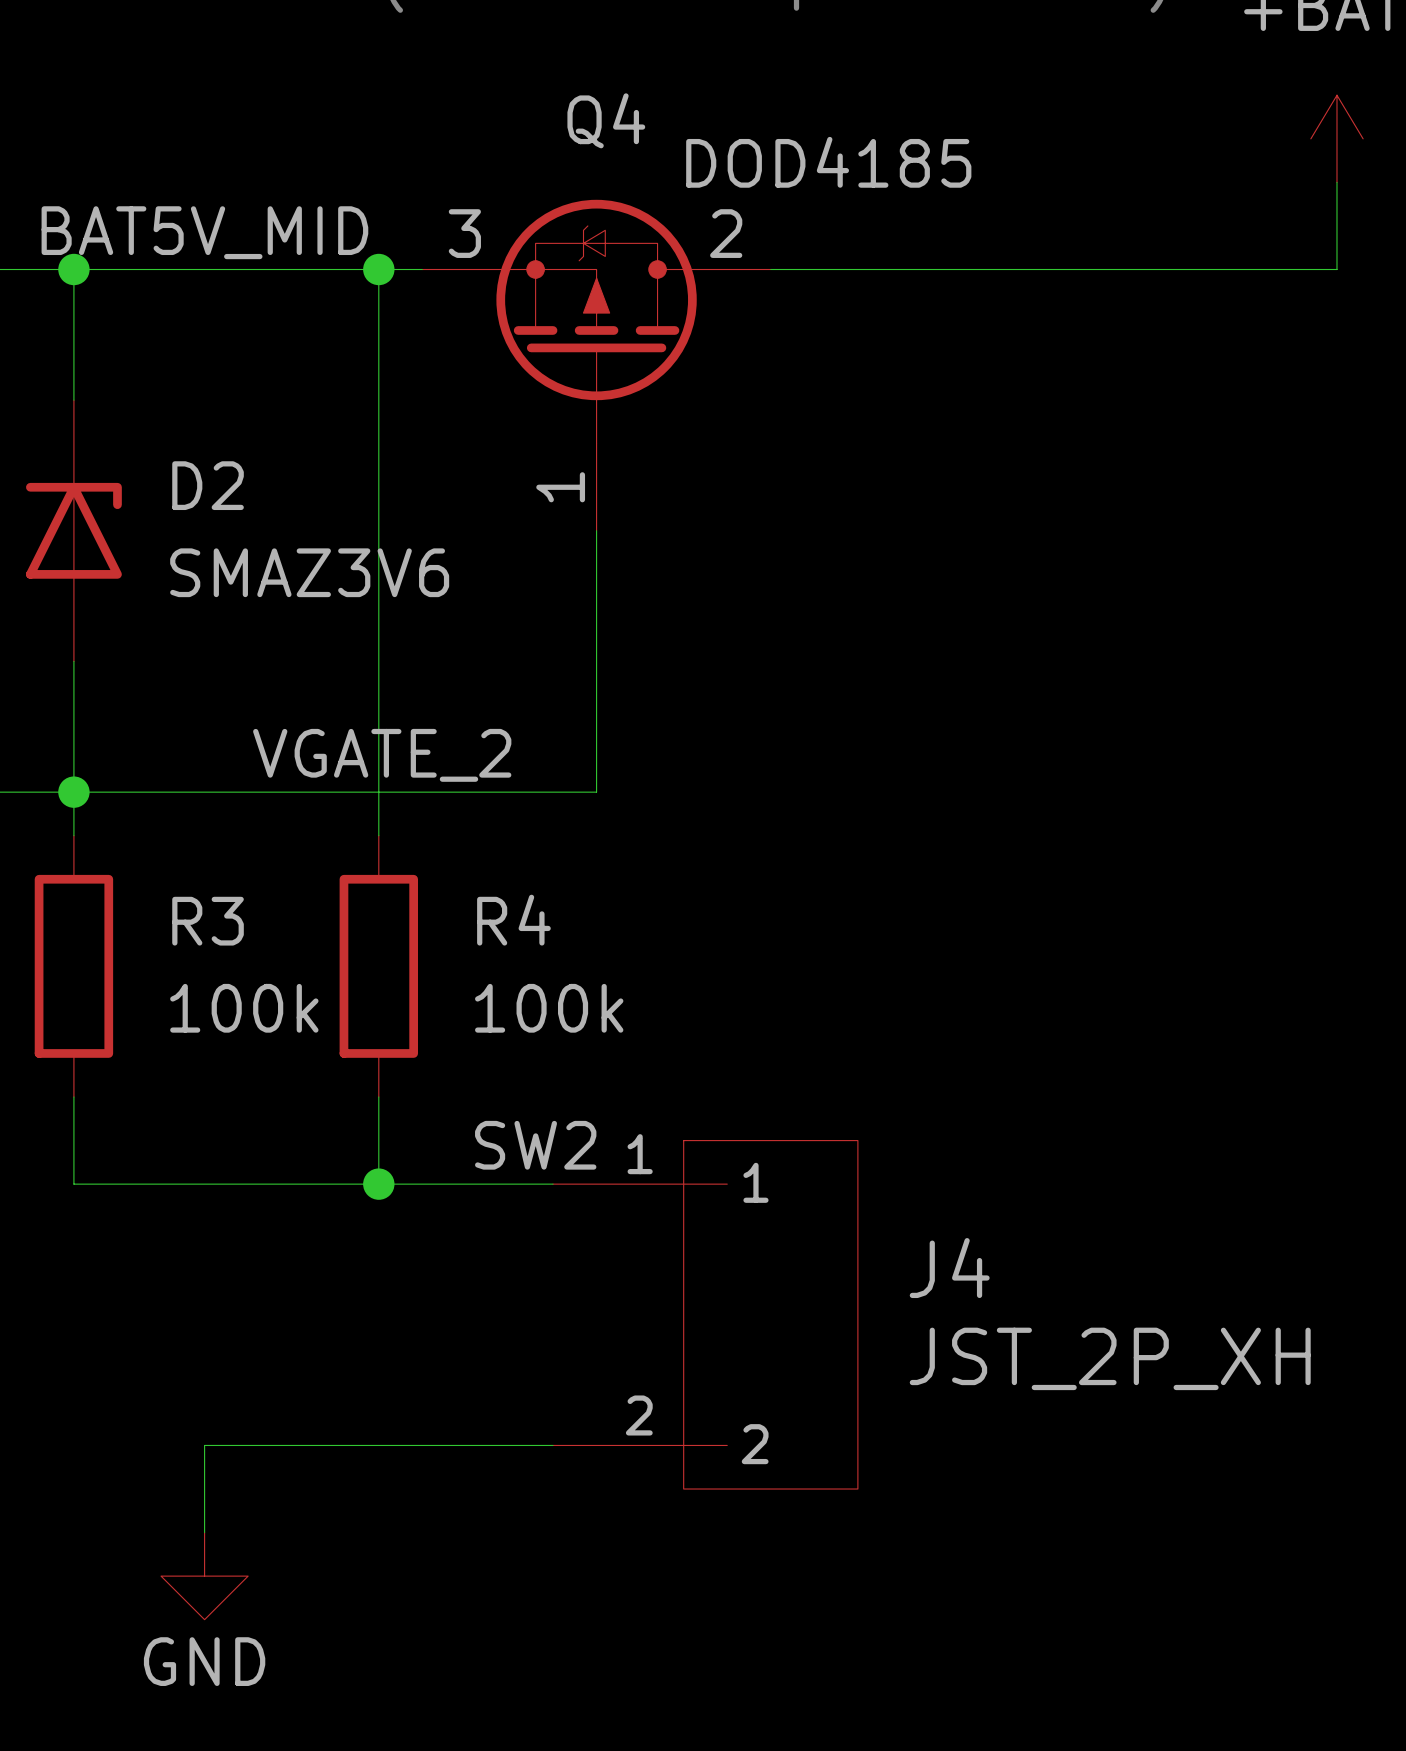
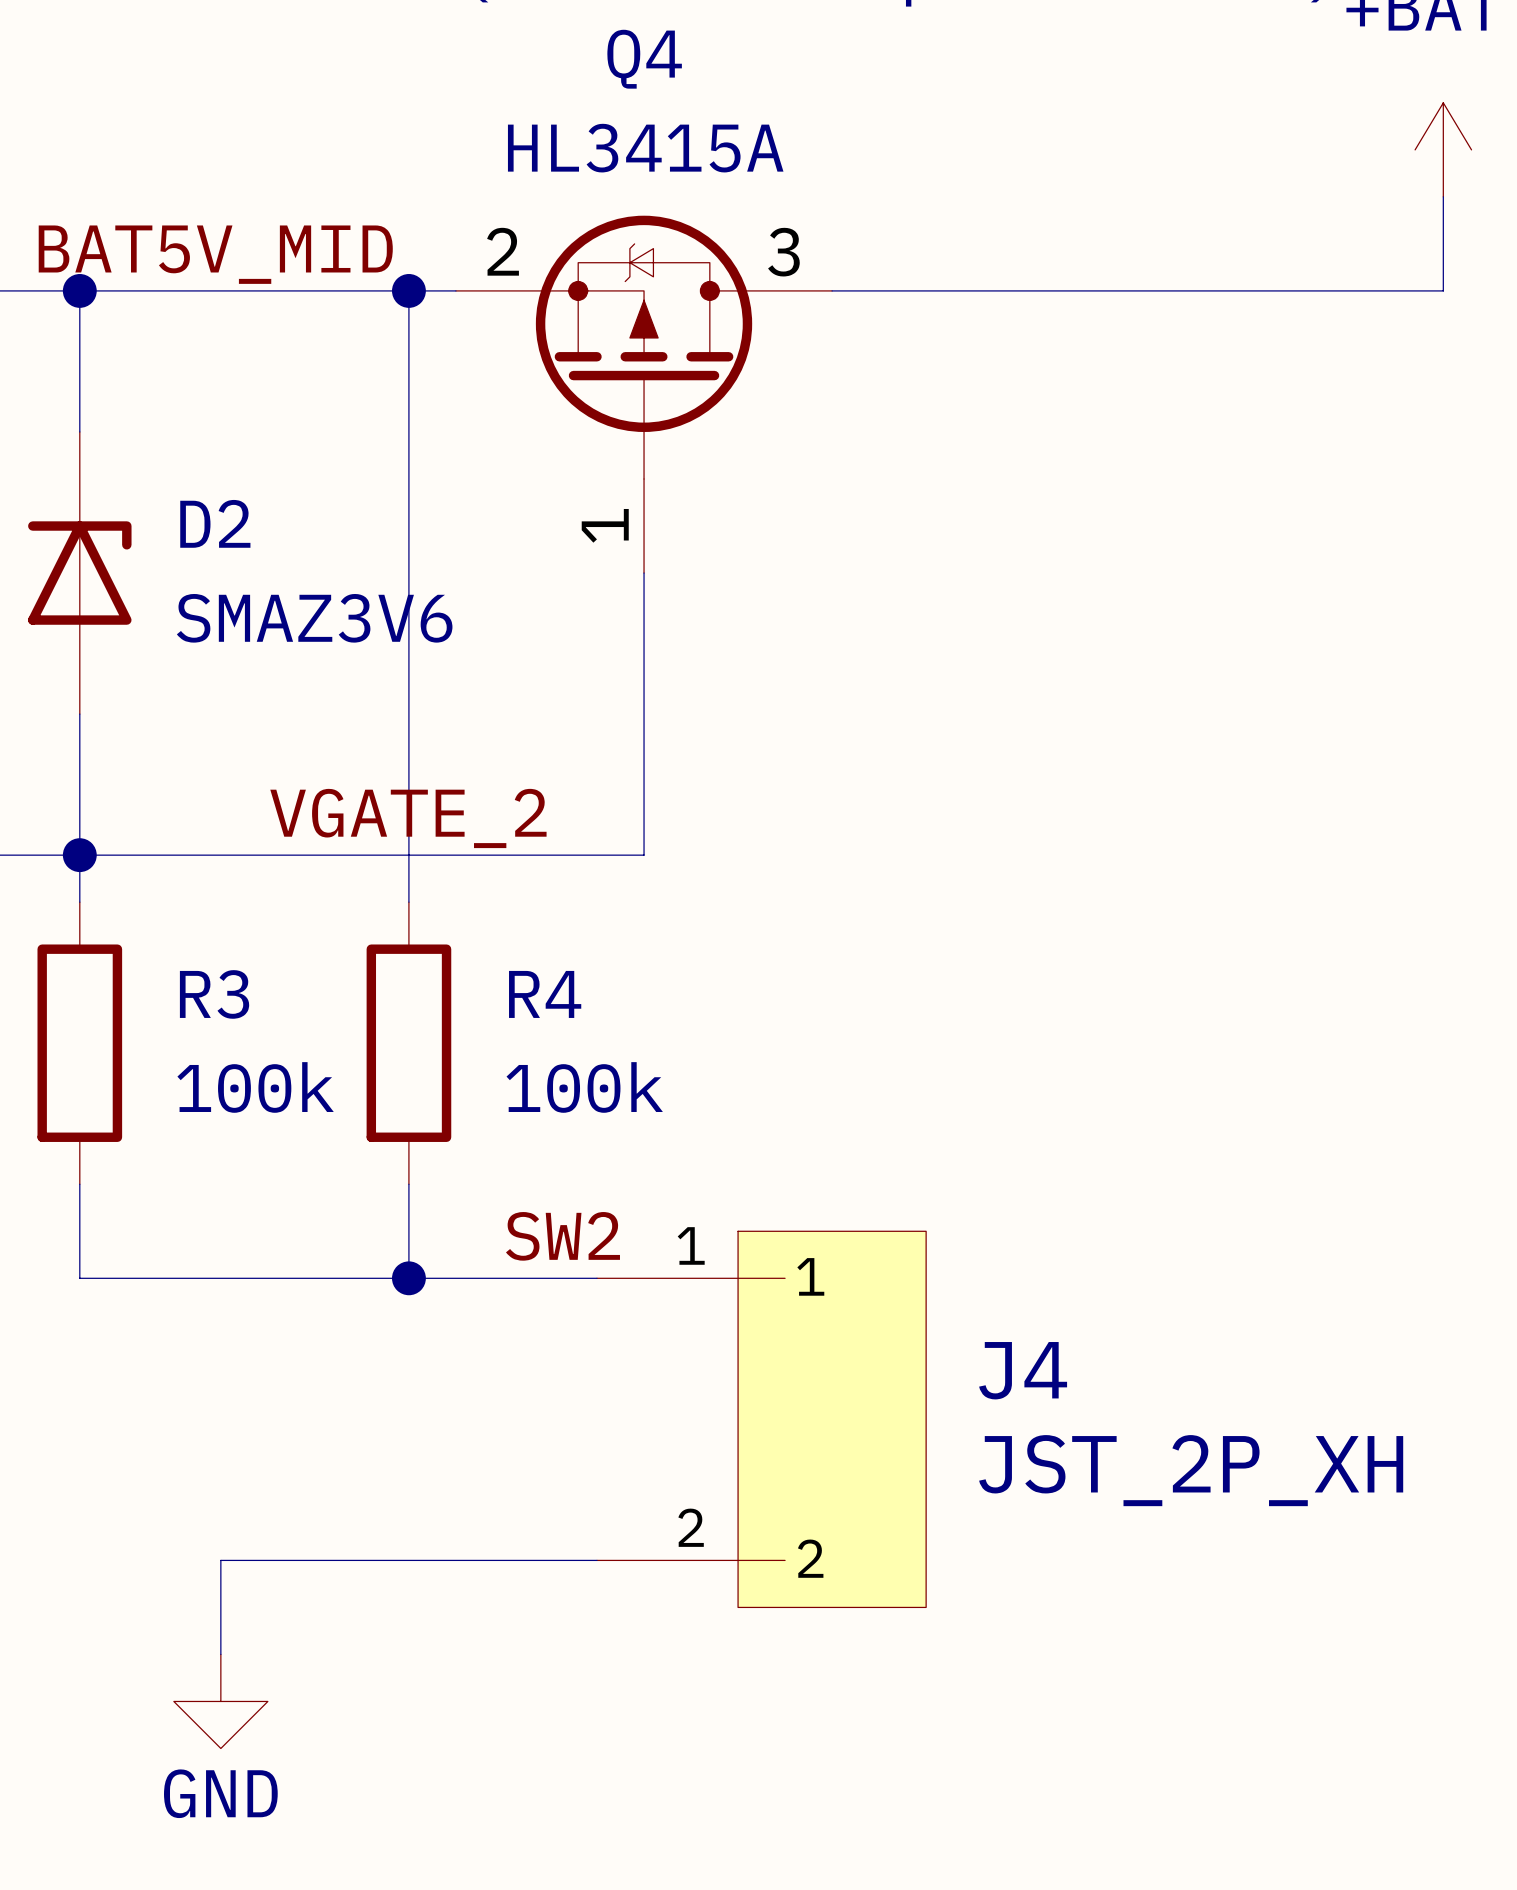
Q4 name position: Q4 (606, 120) -> Q4 (644, 59)
Q4 value: DOD4185 (828, 162) -> HL3415A (645, 148)
Q4 pin number: 3 (464, 233) -> 2 (503, 251)
Q4 pin number: 2 (726, 233) -> 3 (783, 252)

